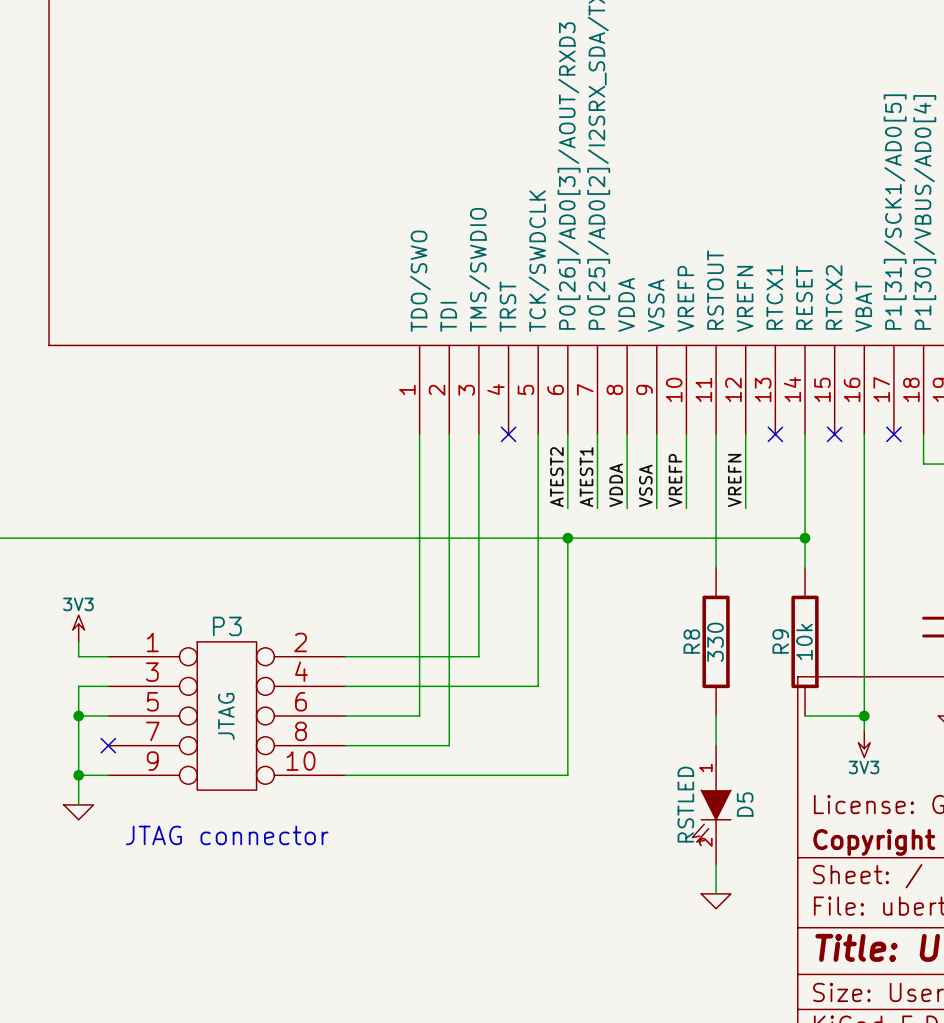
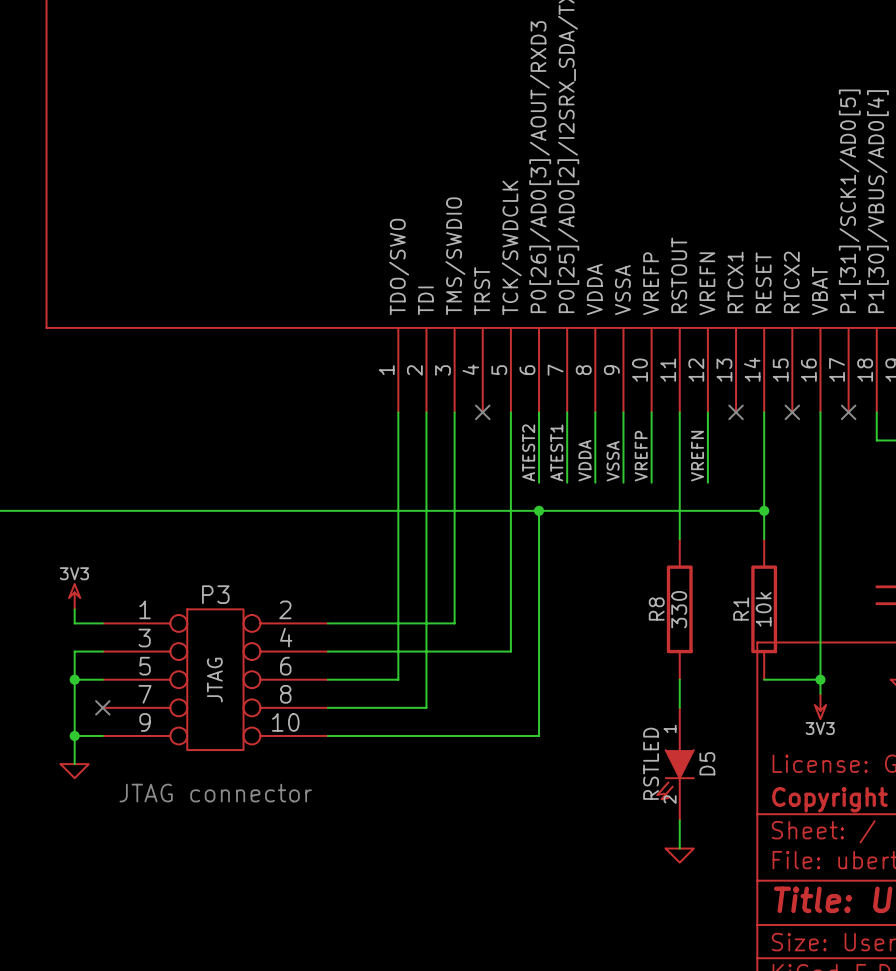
R9 name: R9 (780, 641) -> R1 (741, 609)

